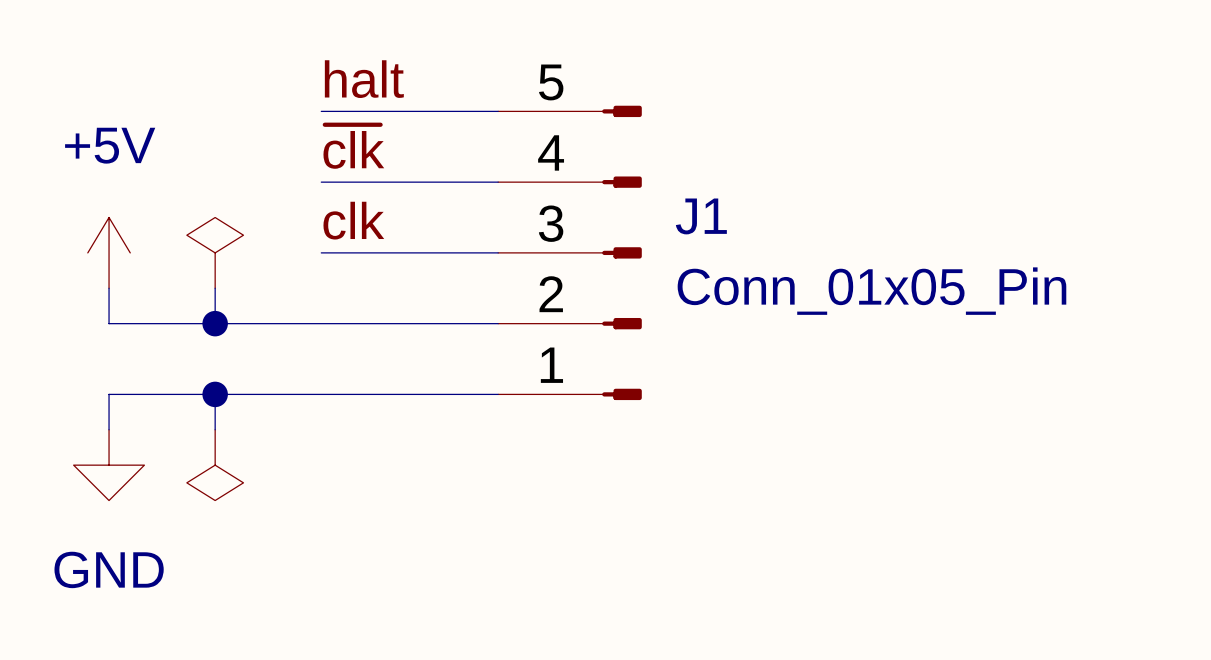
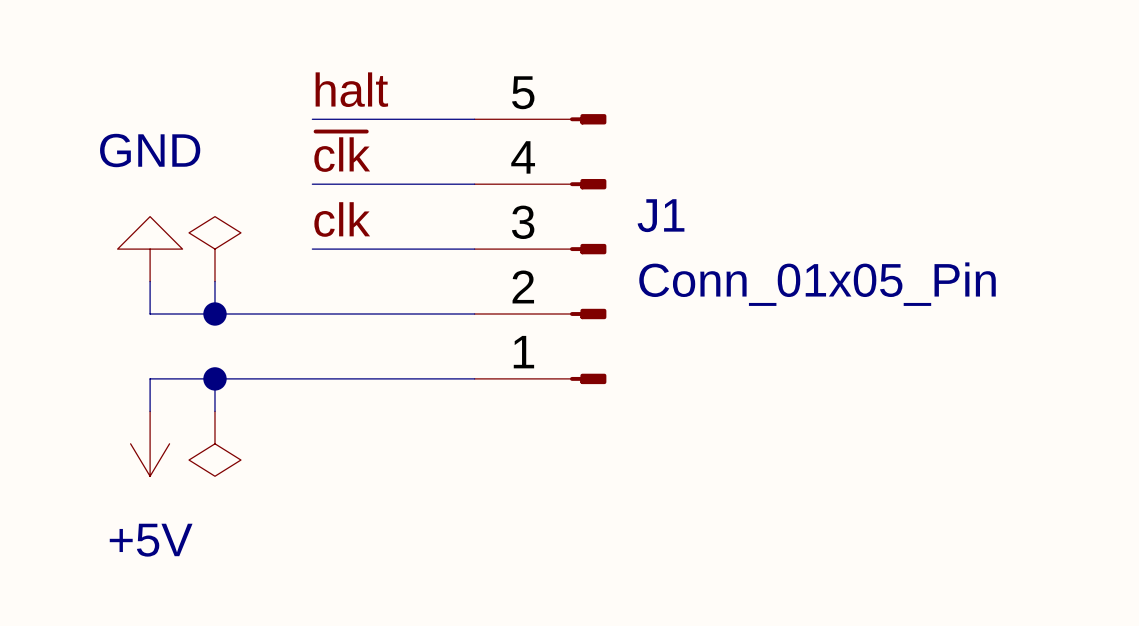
power symbol rotation: 0° (109, 252) -> 180° (150, 443)
power symbol position: +5V (109, 252) -> +5V (150, 443)
wire: (109, 288) (109, 323) (144, 323) -> (150, 281) (150, 314)
wire: (144, 394) (109, 394) (109, 429) -> (150, 378) (150, 411)
power symbol rotation: 0° (109, 465) -> 180° (150, 249)
power symbol position: GND (109, 465) -> GND (150, 249)

